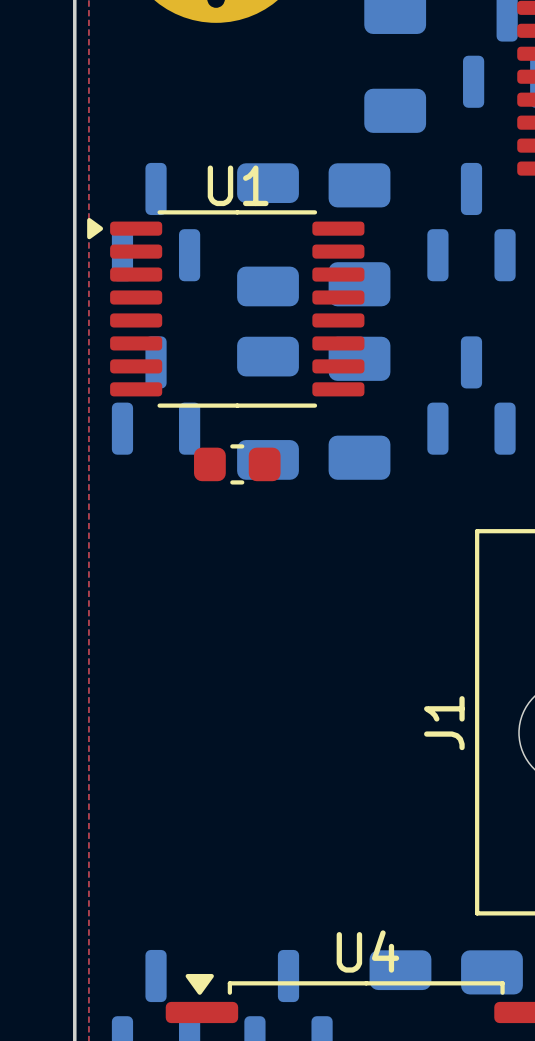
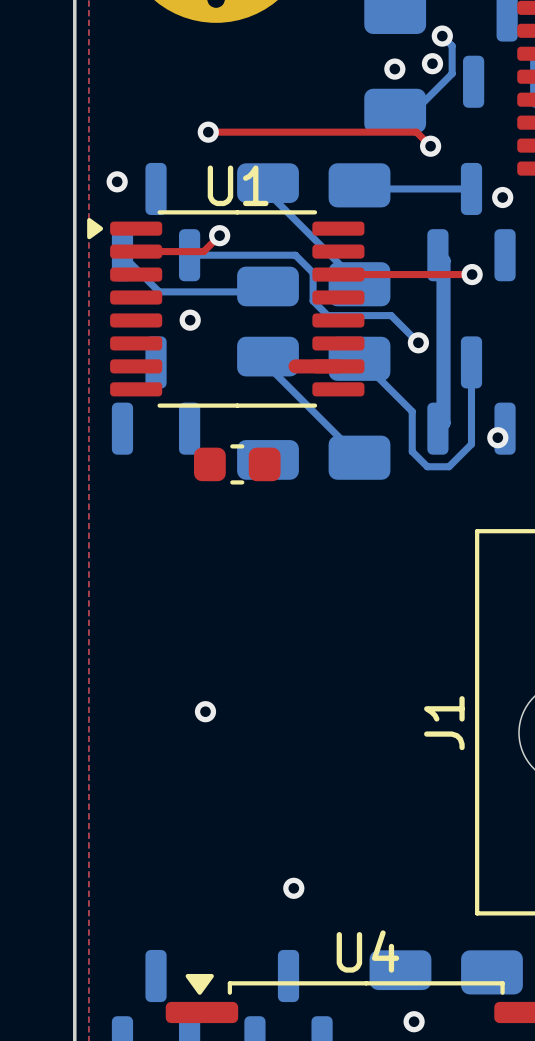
bottom track: none -> (442, 36) (452, 45) (452, 73) (415, 110) (395, 110)
via: none -> (442, 36)
via: none -> (432, 63)
via: none -> (394, 69)
top track: none -> (208, 132) (416, 132) (430, 146)
via: none -> (208, 132)
via: none -> (430, 146)
via: none -> (117, 181)
bottom track: none -> (268, 183) (268, 192) (359, 284)
bottom track: none -> (359, 185) (363, 188) (471, 188)
via: none -> (502, 197)
top track: none -> (219, 235) (203, 251) (136, 251)
via: none -> (219, 235)
bottom track: none -> (122, 255) (159, 291) (262, 291) (268, 286)
bottom track: none -> (189, 255) (295, 255) (313, 272) (313, 300) (327, 315) (391, 315) (418, 342)
bottom track: none -> (437, 255) (443, 260) (443, 423) (437, 428)
top track: none -> (338, 274) (472, 274)
via: none -> (472, 274)
via: none -> (190, 320)
via: none -> (418, 342)
bottom track: none -> (268, 356) (268, 366) (359, 457)
bottom track: none -> (359, 358) (412, 411) (412, 451) (427, 466) (449, 466) (471, 444) (471, 362)
top track: none -> (295, 366) (338, 366)
via: none -> (497, 437)
via: none -> (205, 711)
via: none -> (293, 888)
via: none -> (414, 1021)

